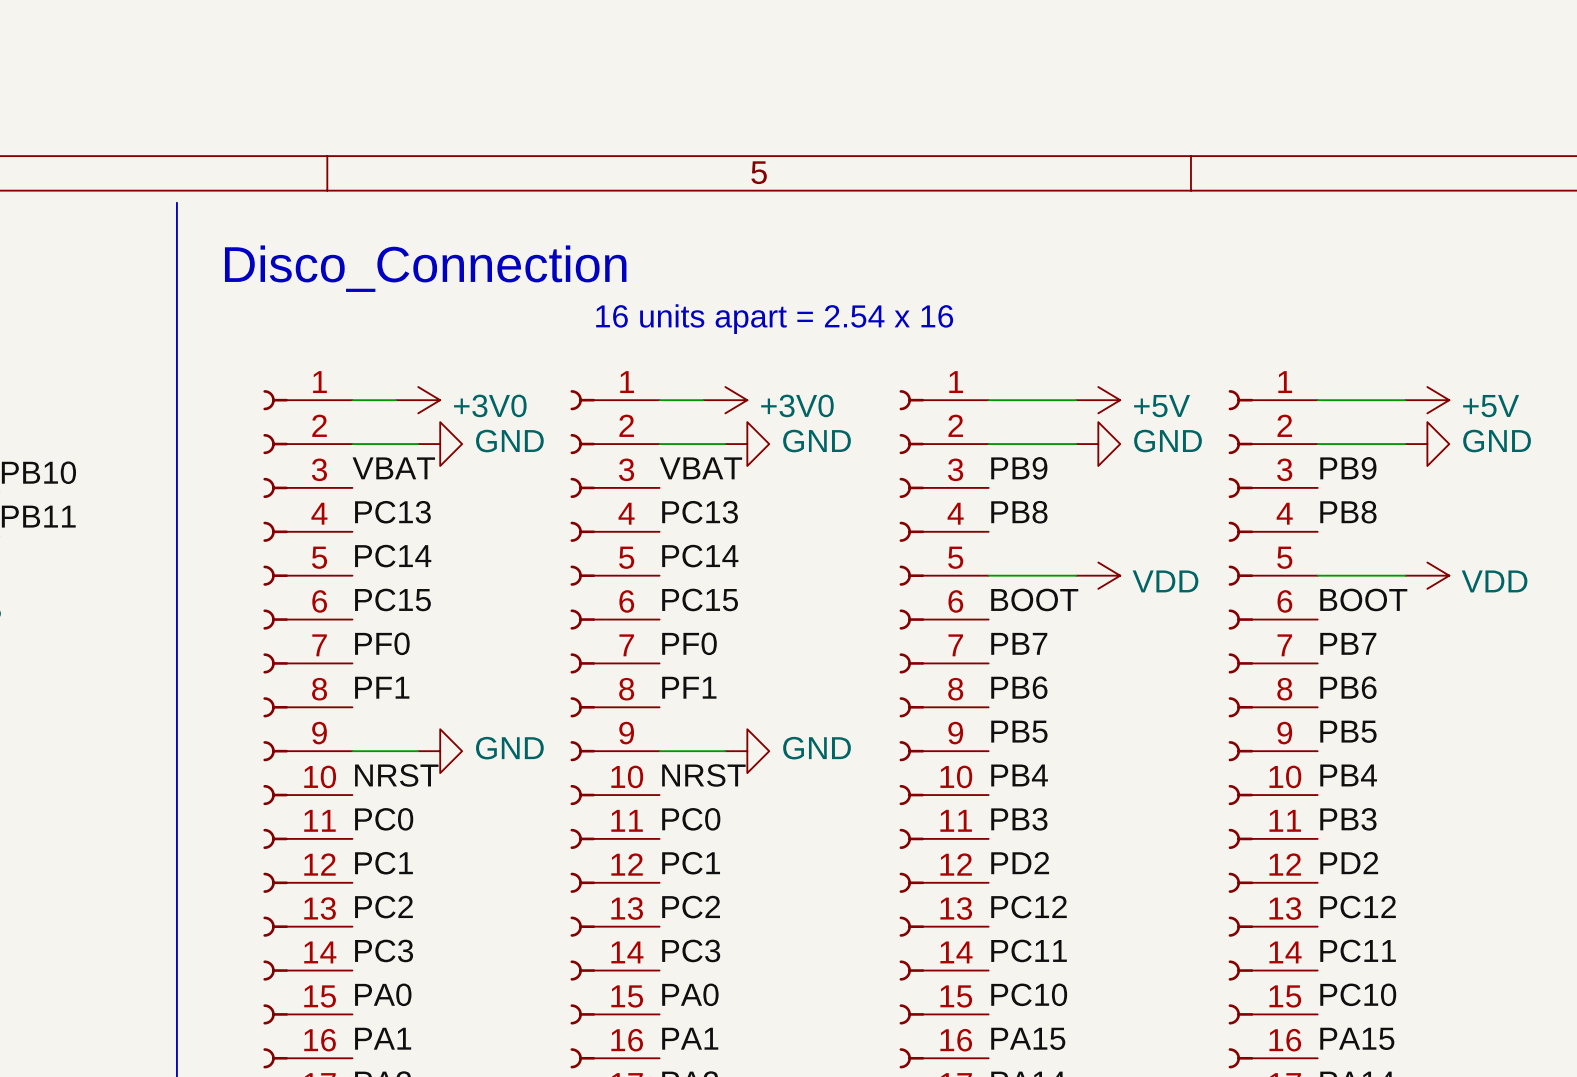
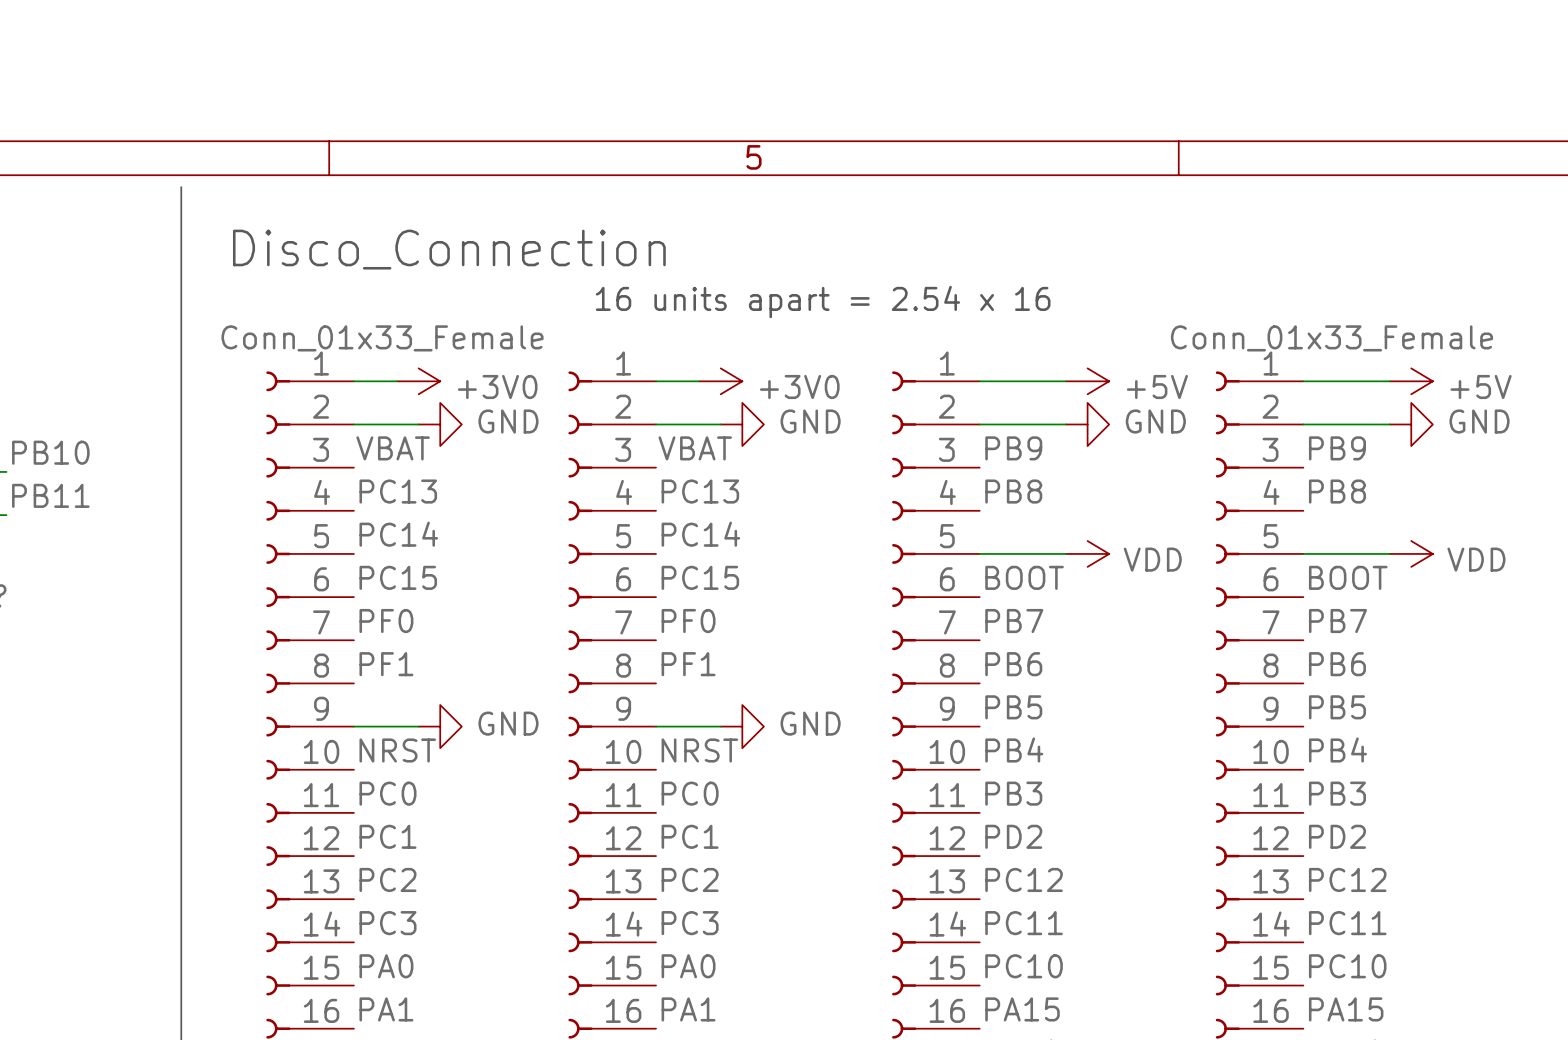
part value: none -> Conn_01x33_Female (382, 338)
part value: none -> Conn_01x33_Female (1331, 338)

